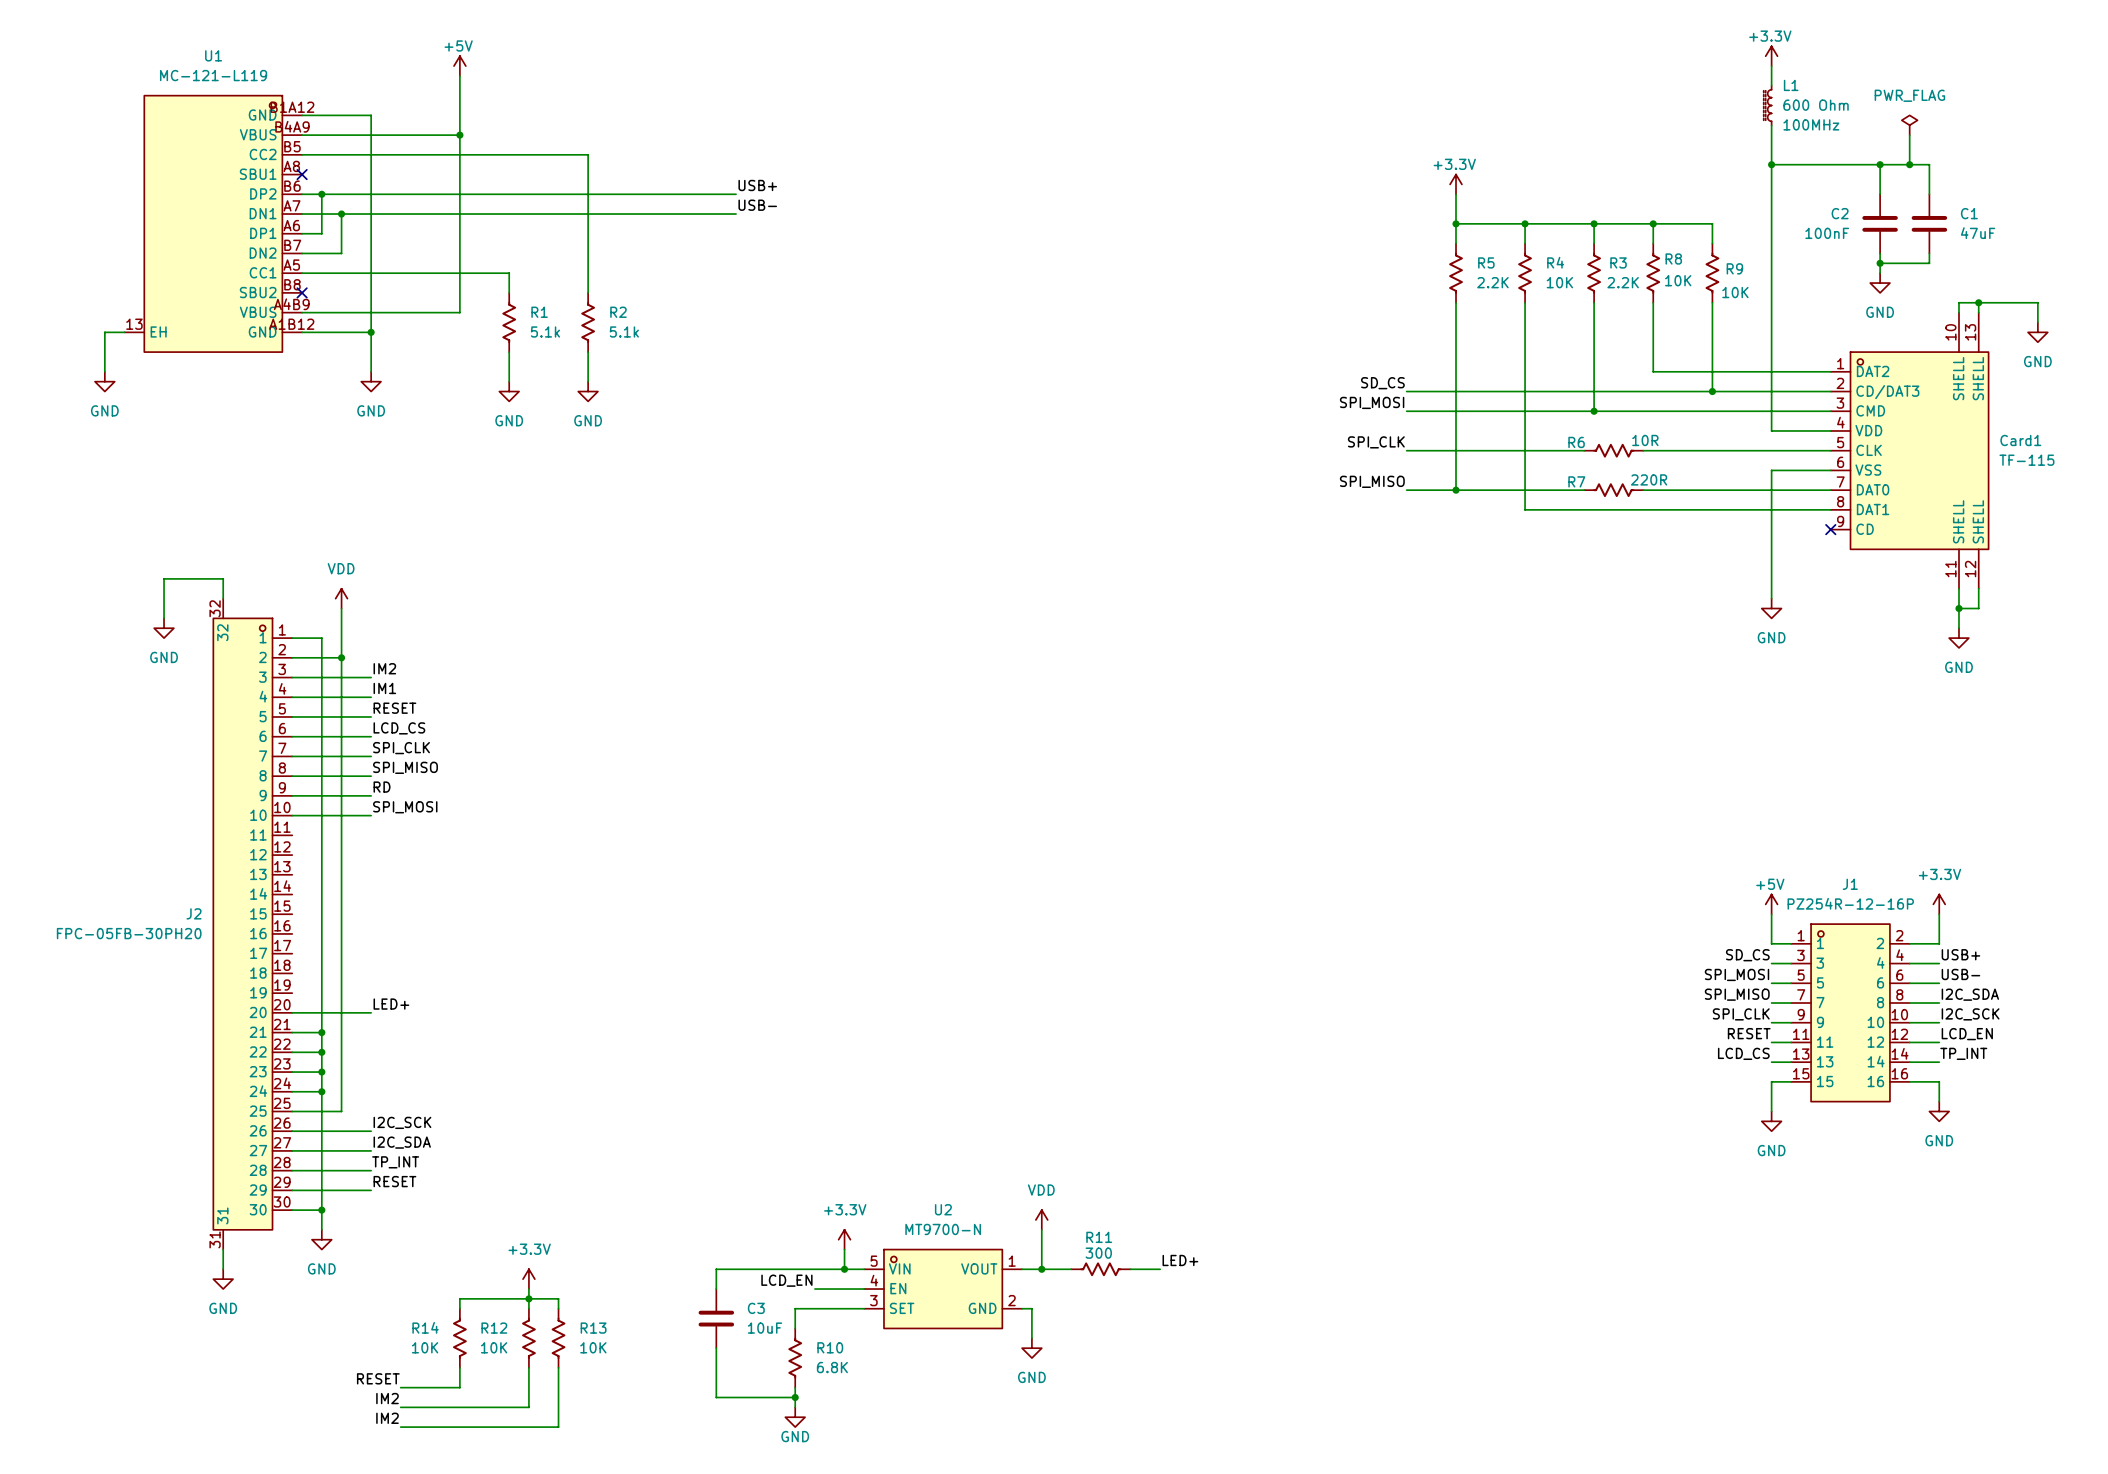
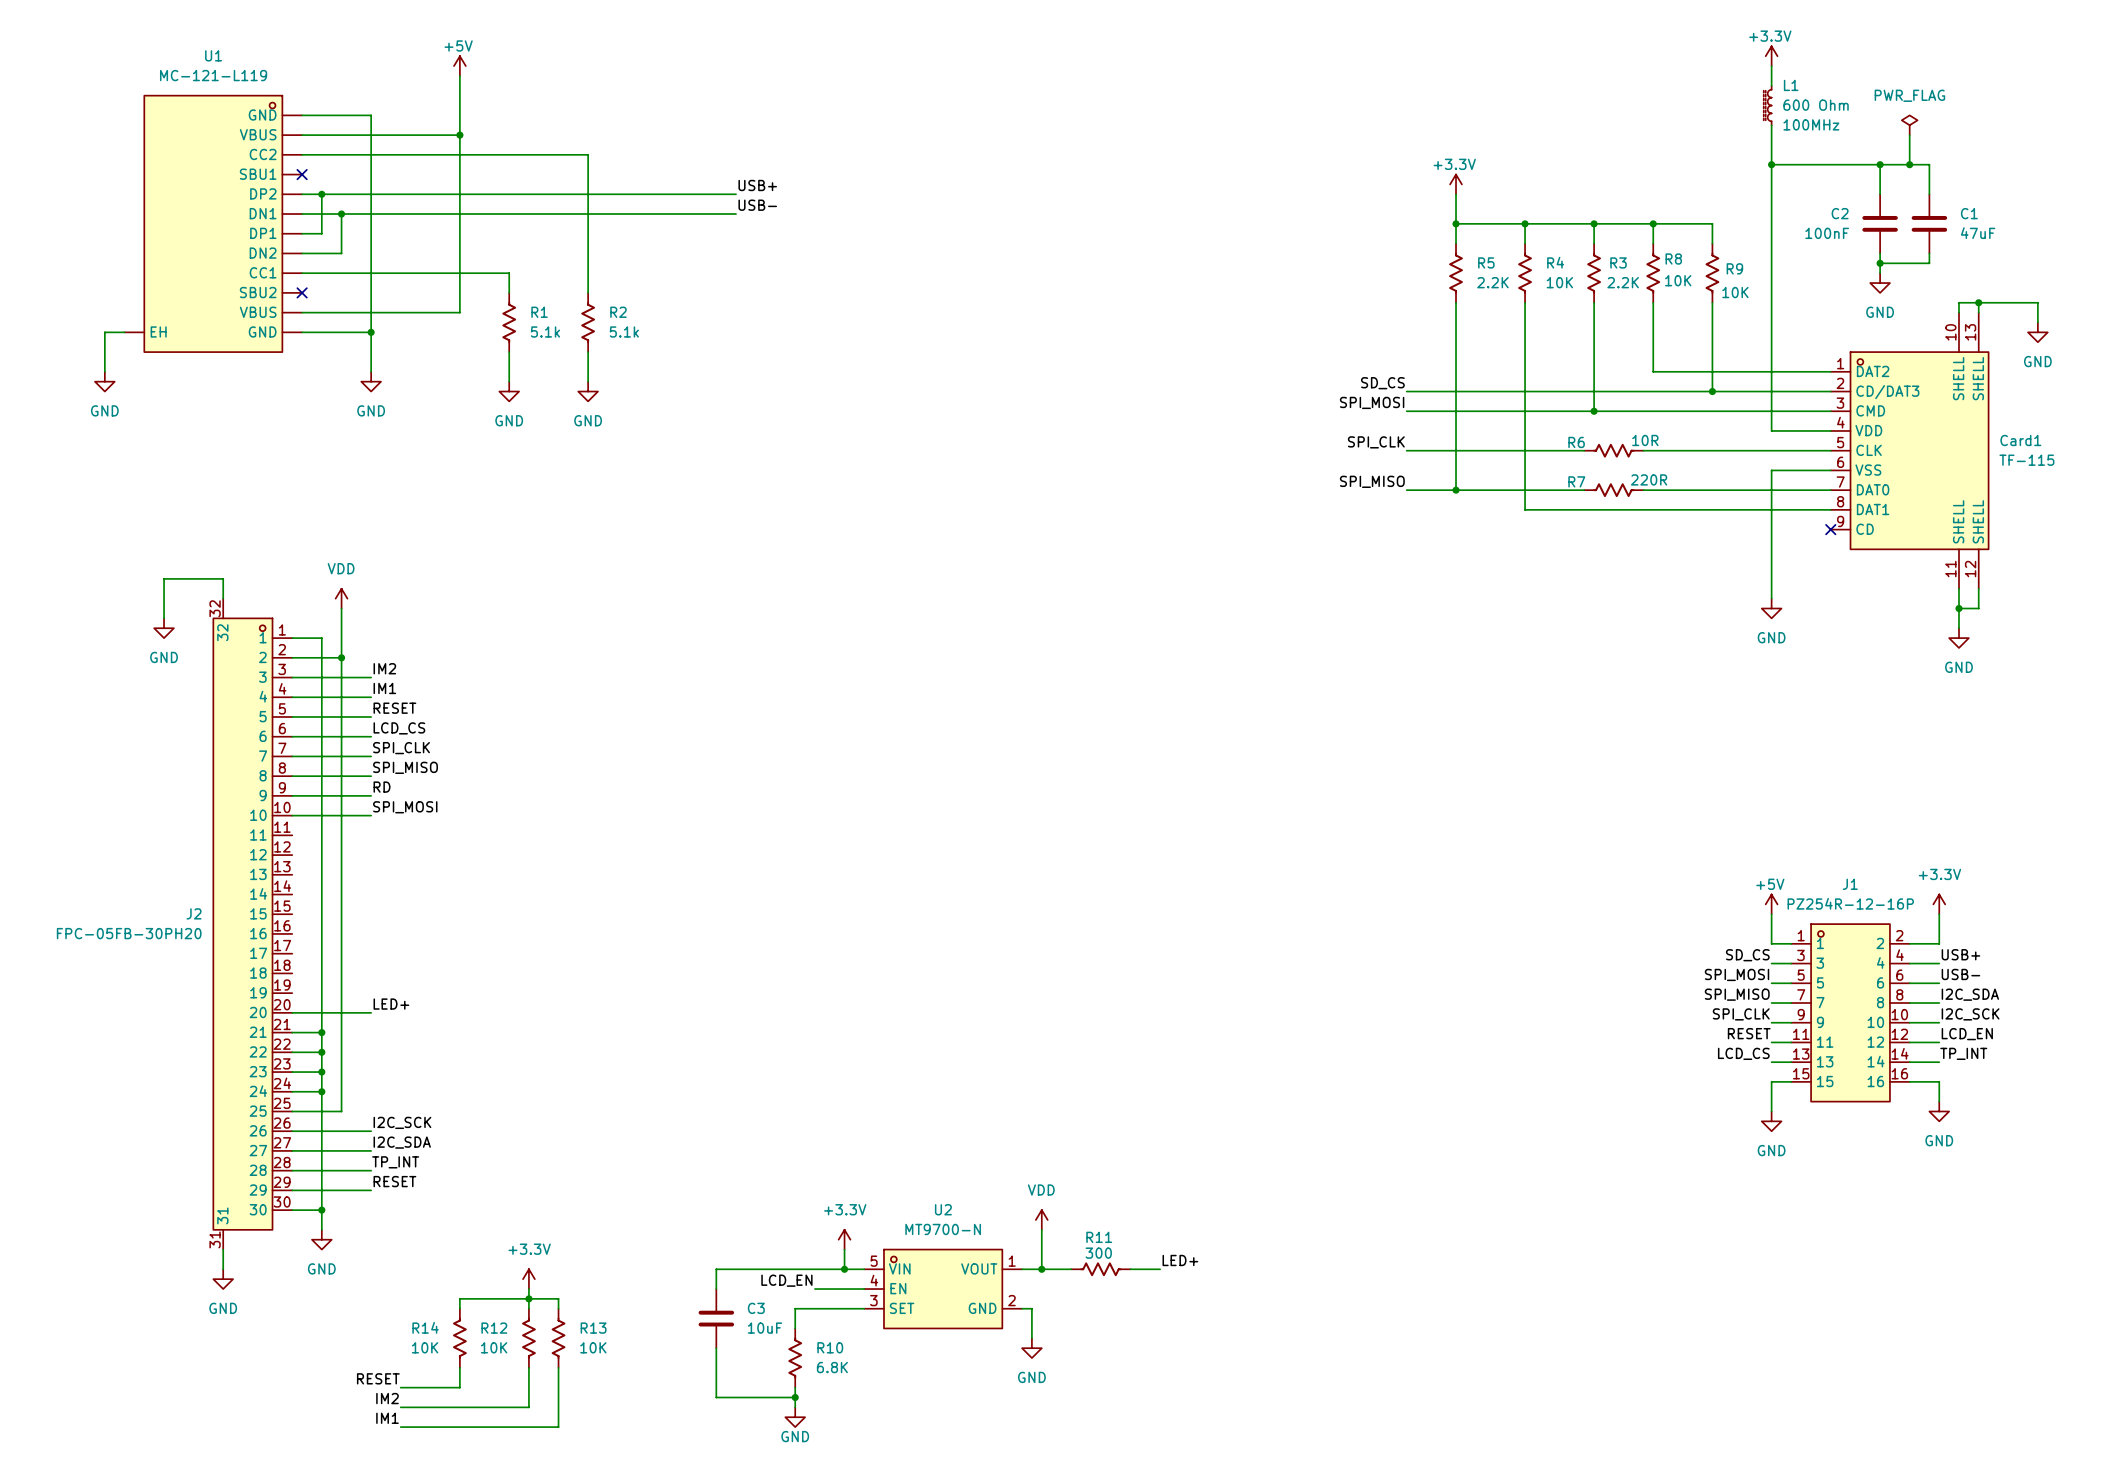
U1 symbol: [124, 95, 303, 353] -> [124, 95, 303, 353]
label: IM2 (387, 1418) -> IM1 (387, 1418)

